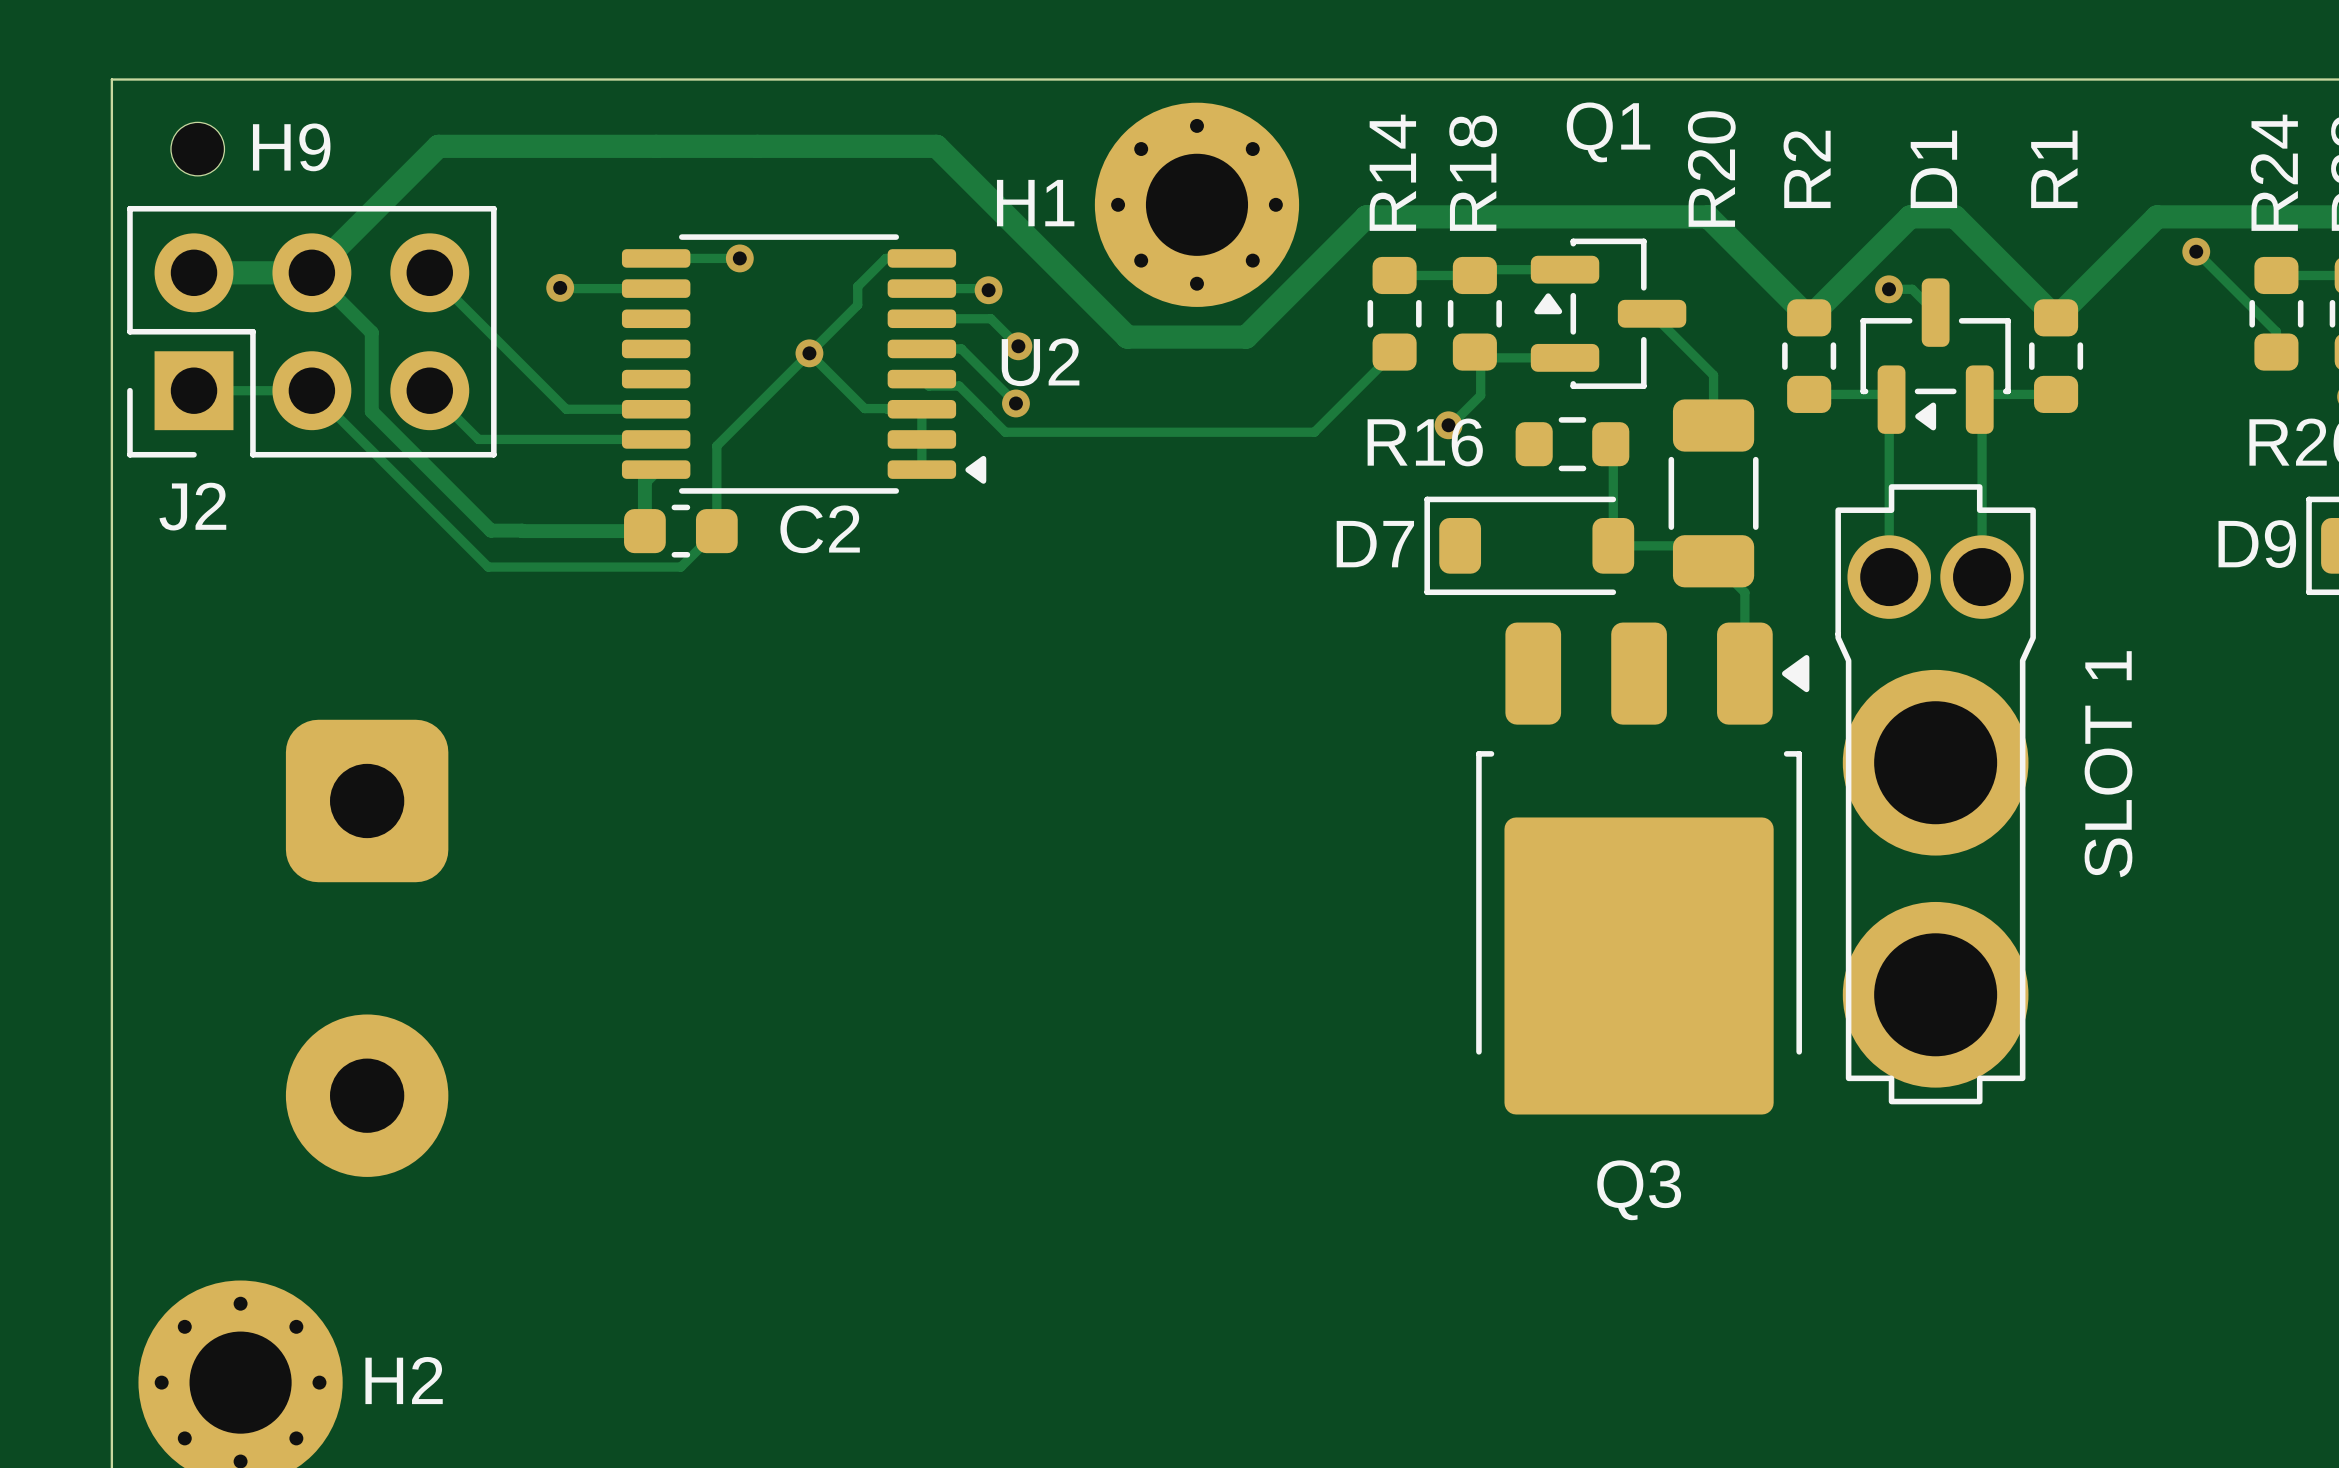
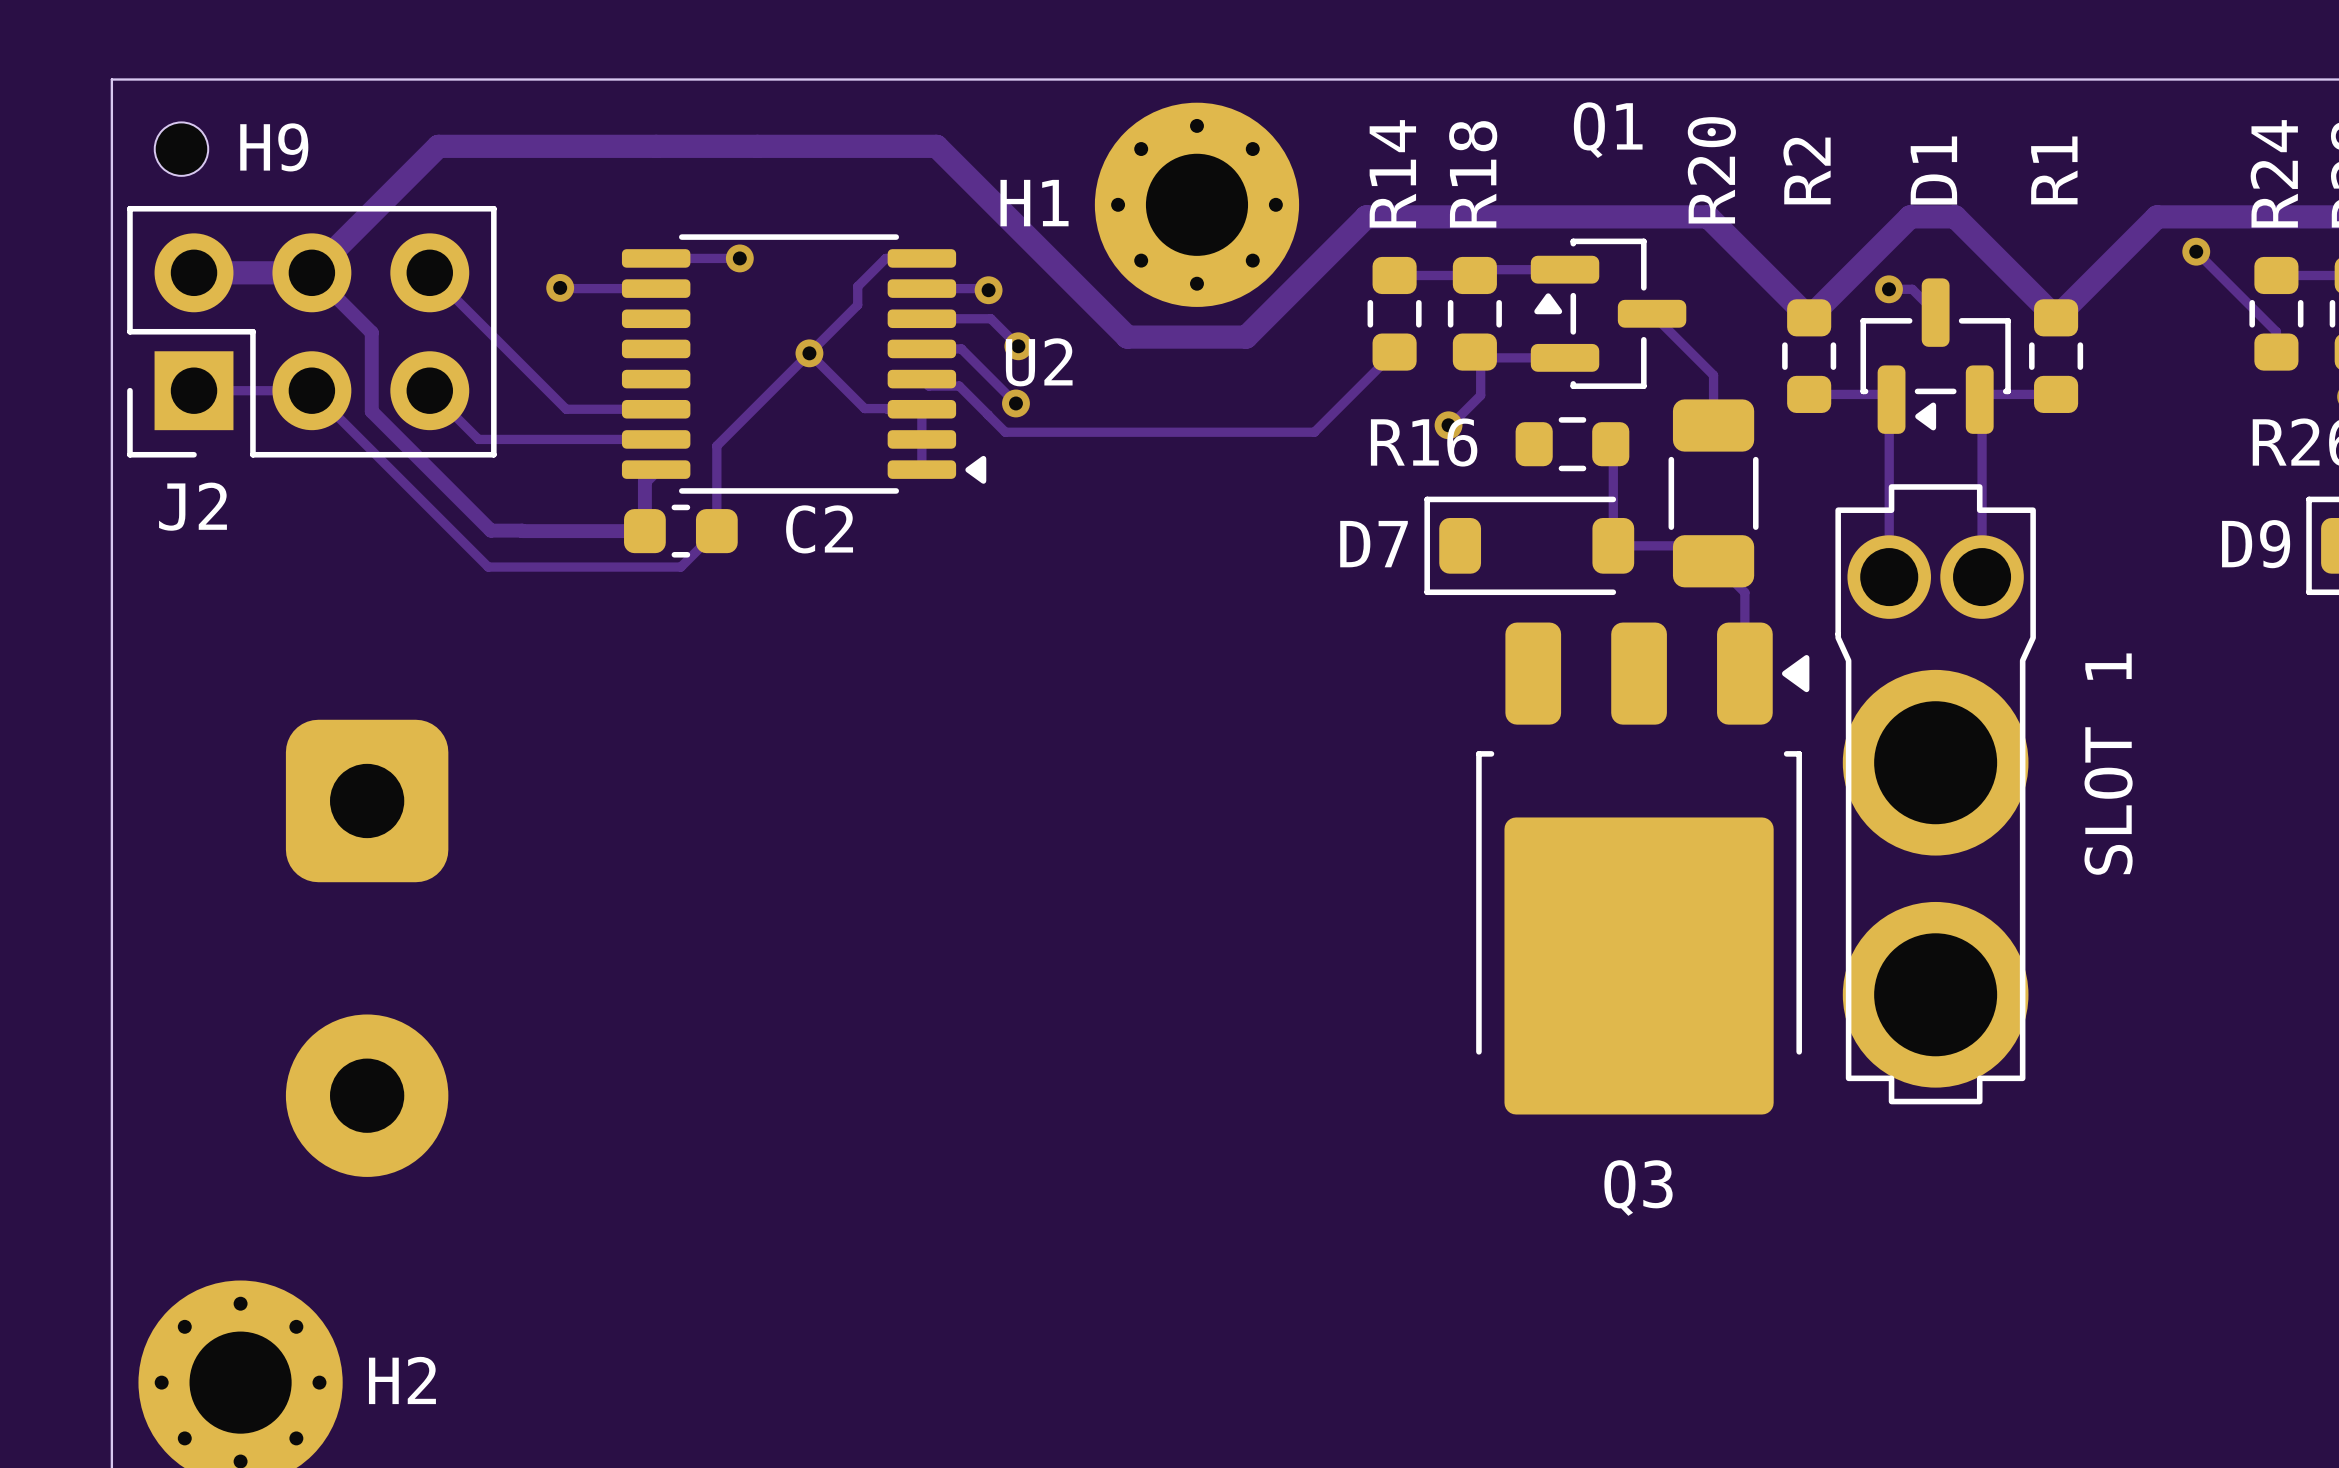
H9 position: (197, 149) -> (181, 149)

